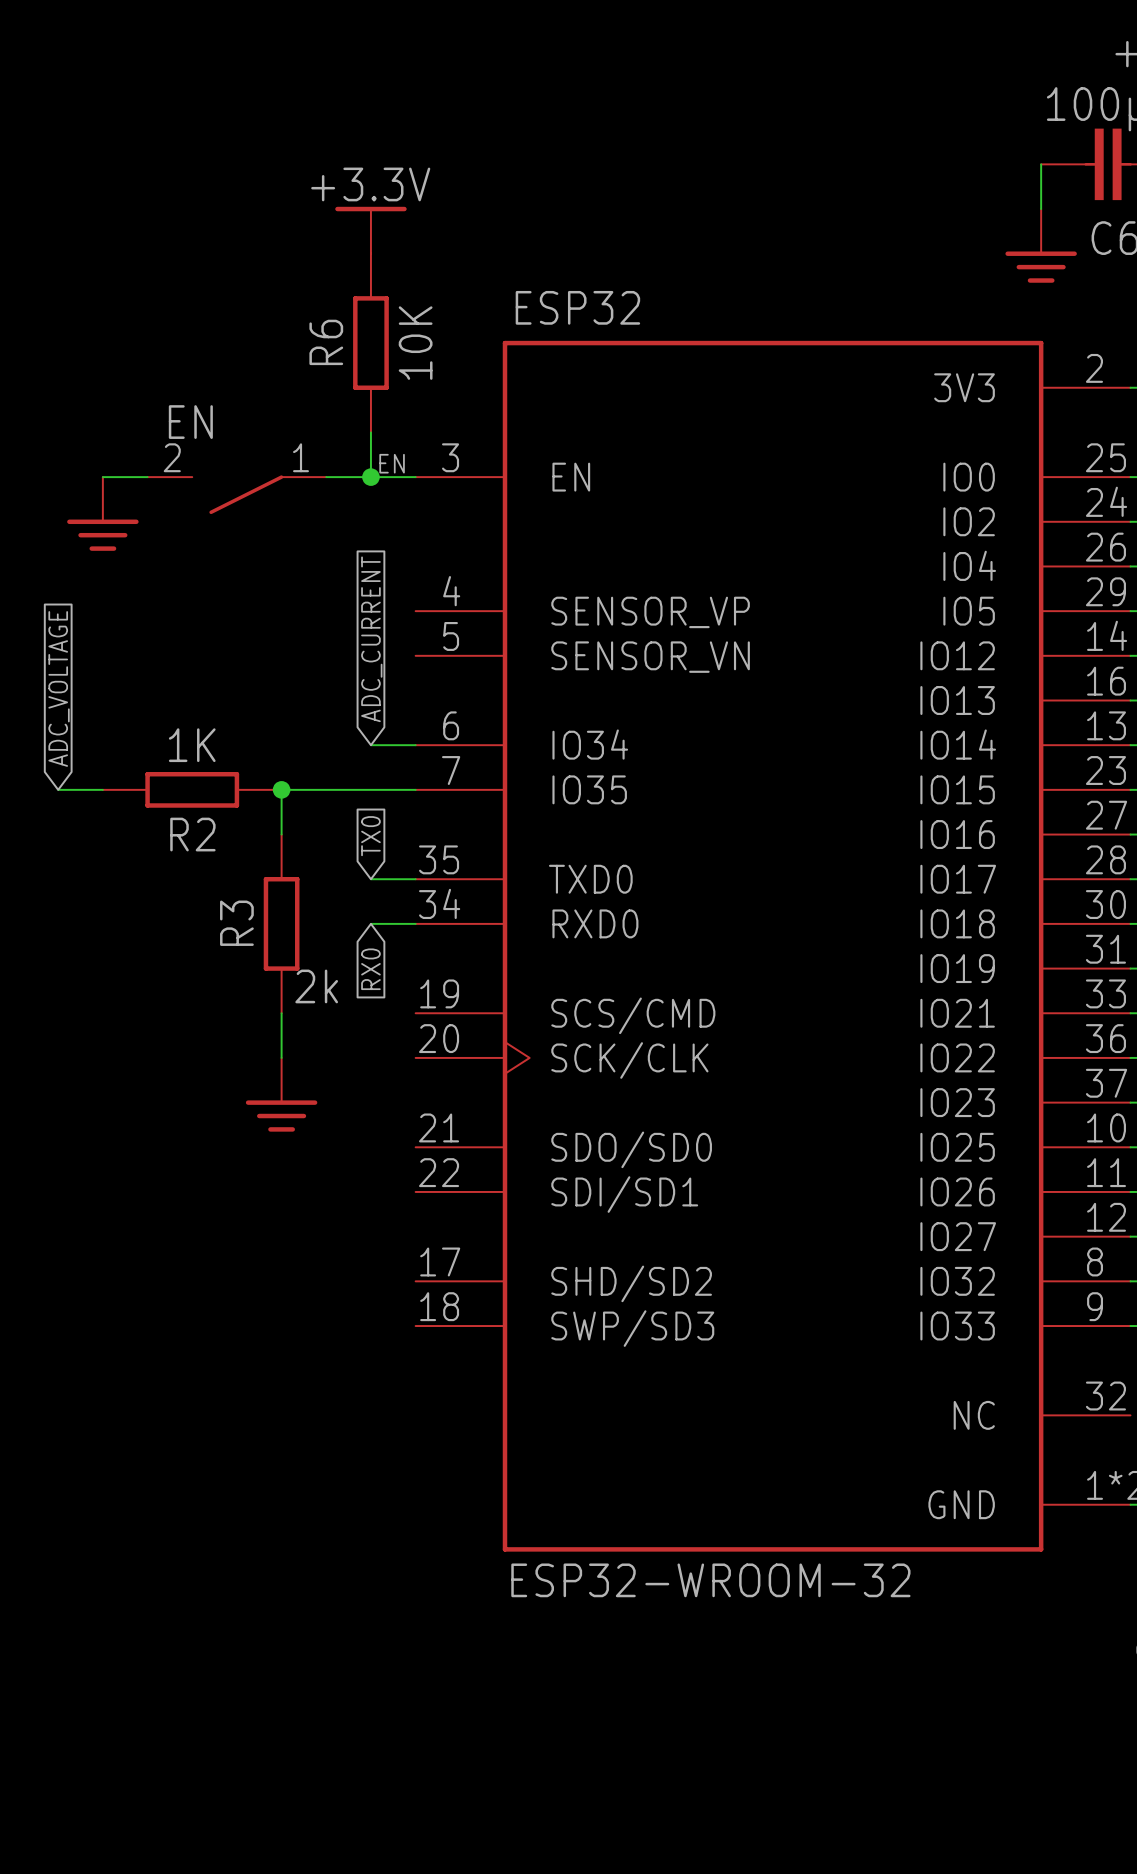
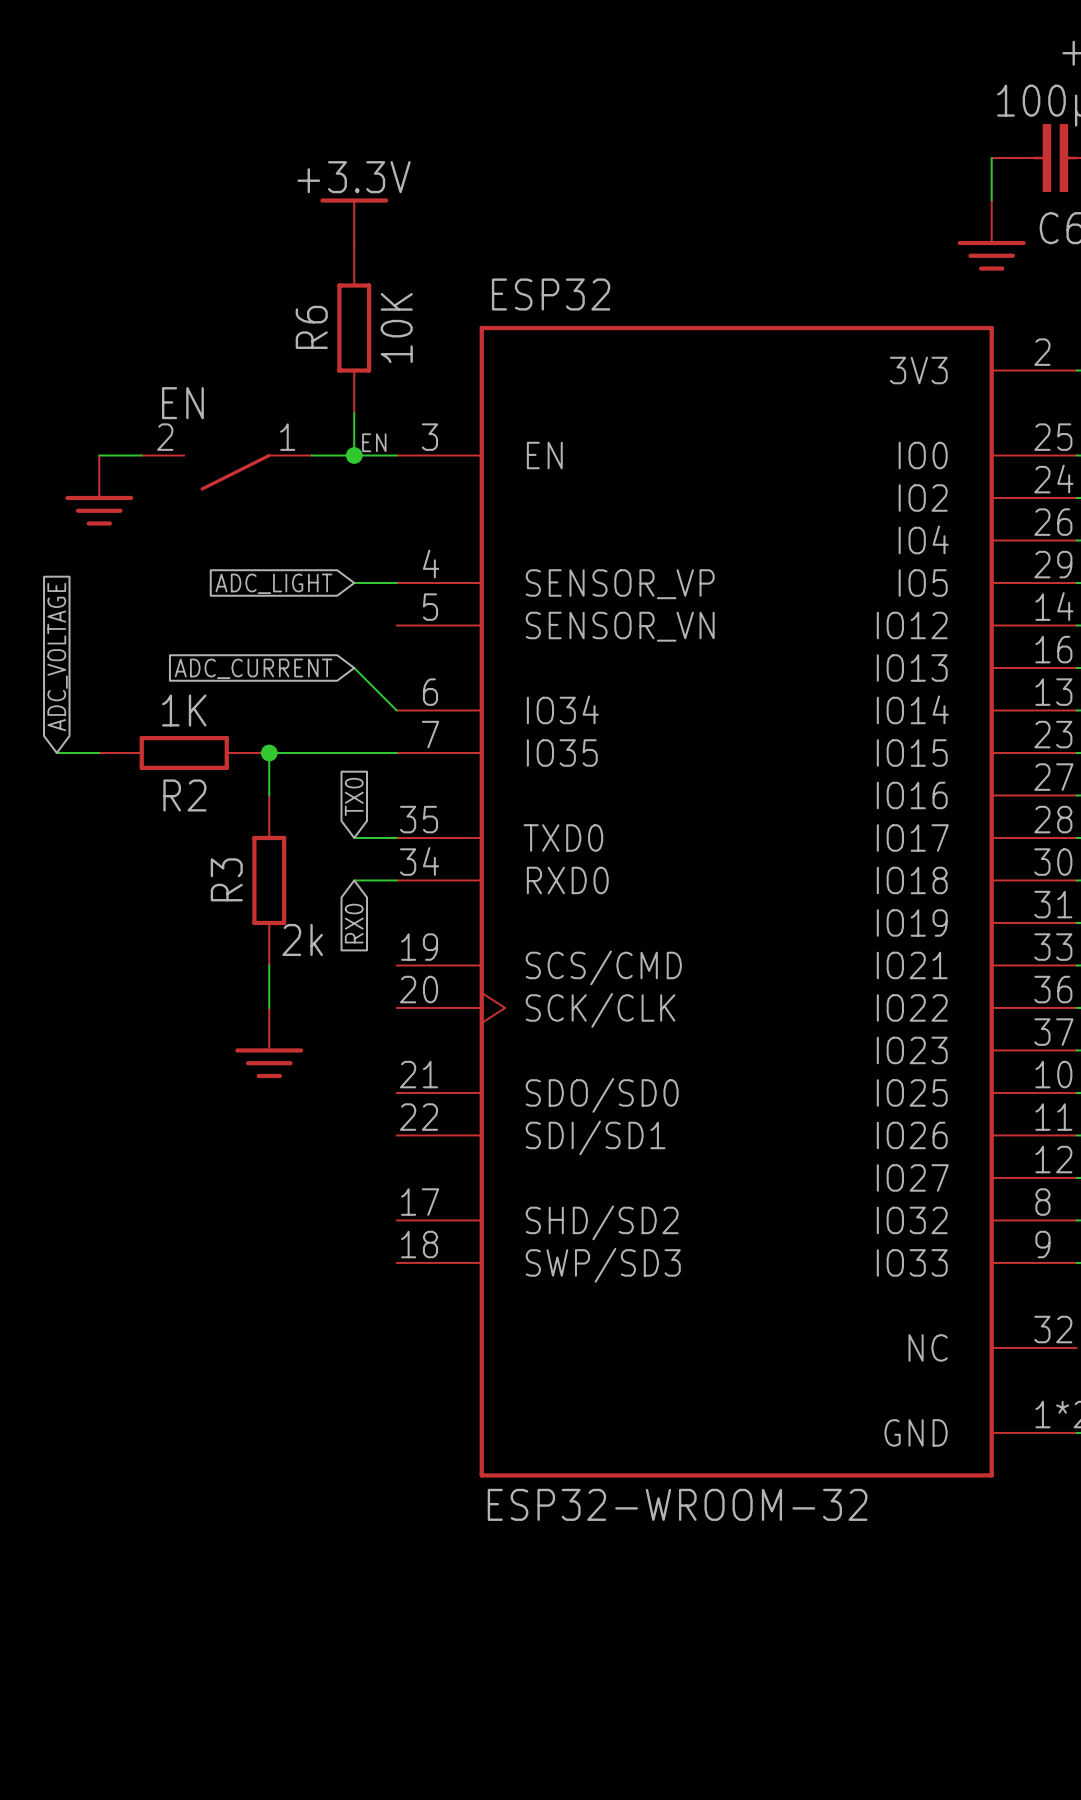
wire: none -> (354, 582) (396, 582)
global label: none -> ADC_LIGHT (273, 583)
global label rotation: 0° (371, 639) -> 90° counterclockwise (253, 668)
wire: (370, 745) (415, 745) -> (354, 667) (396, 710)

